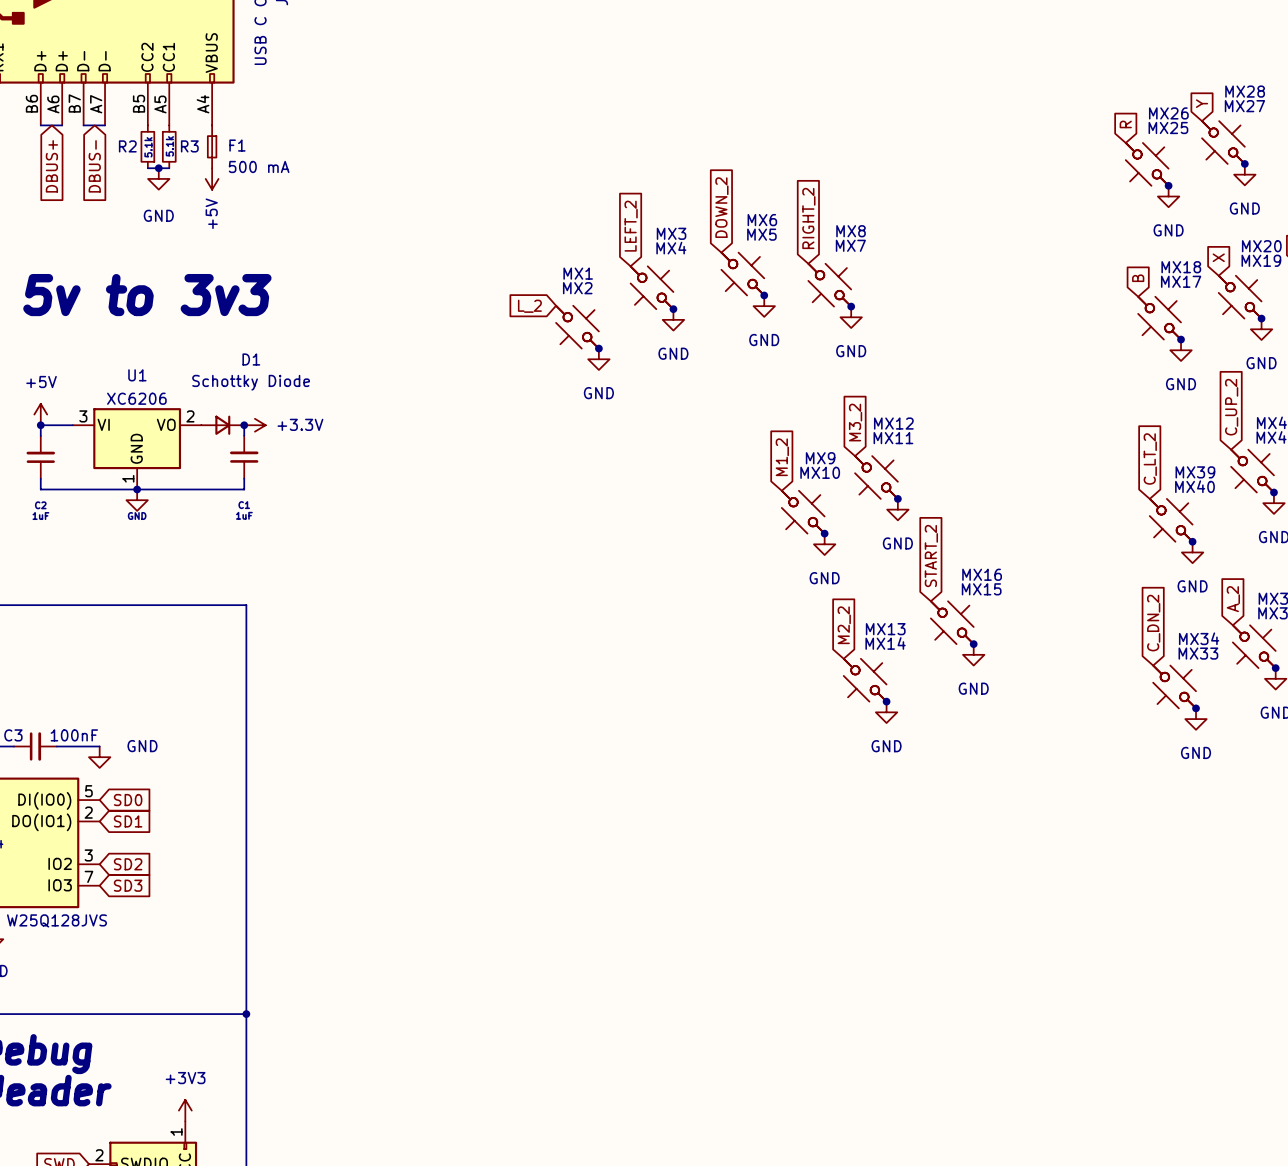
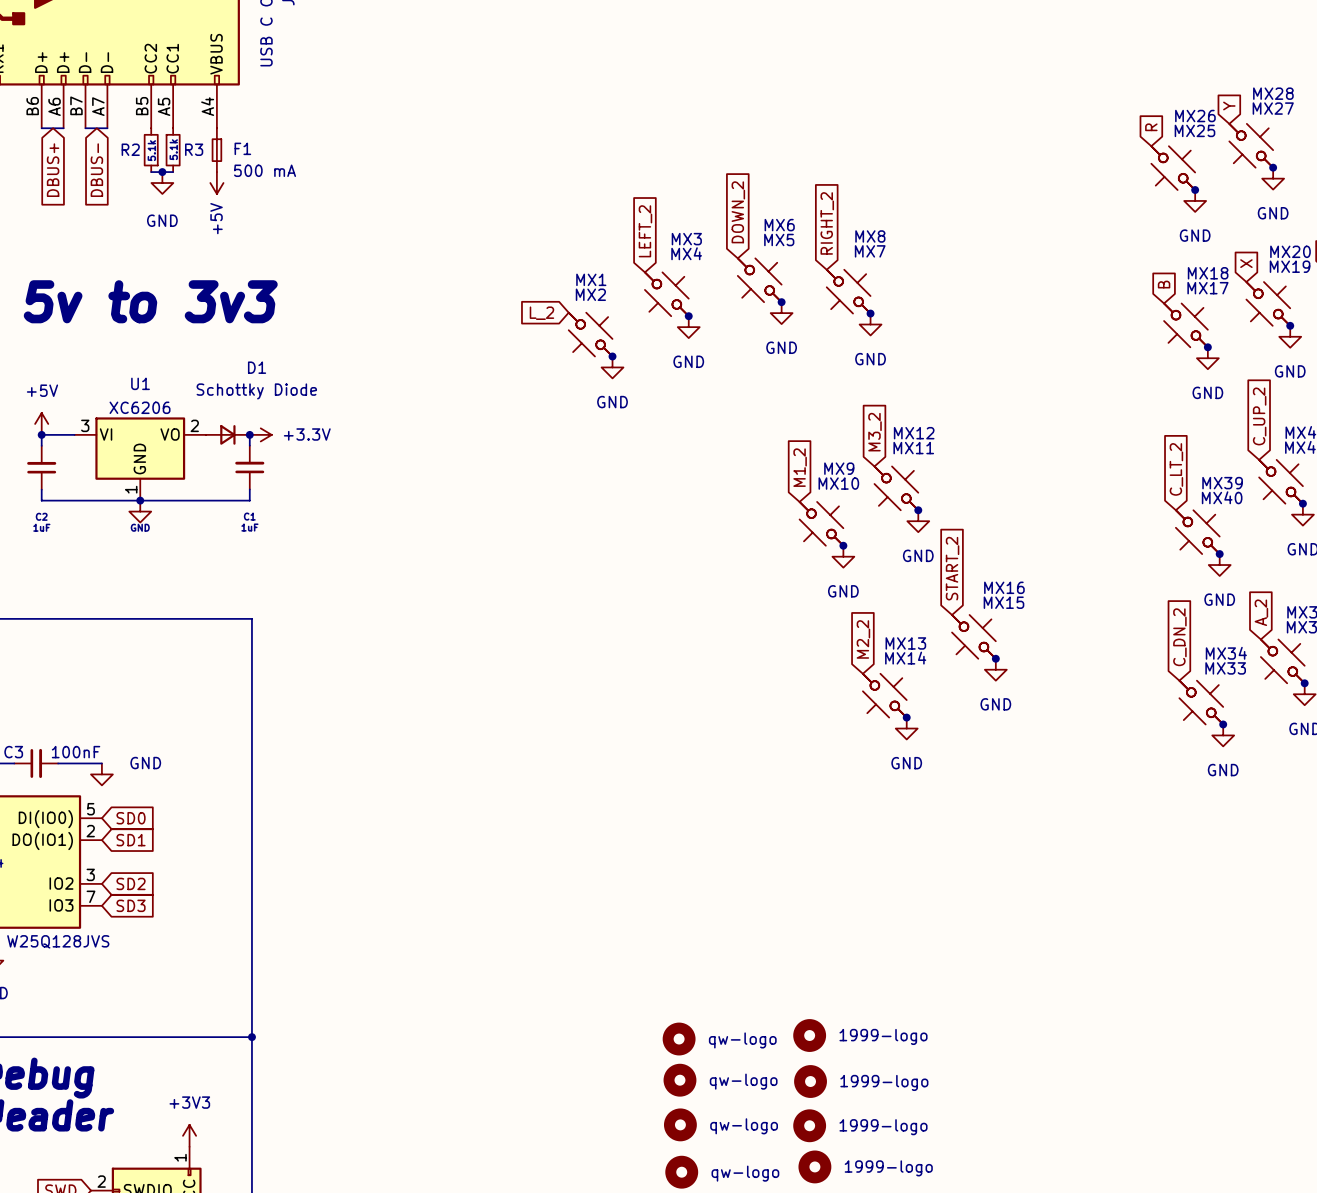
part: none -> 1999-logo (809, 1035)
part: none -> qw-logo (679, 1039)
part: none -> qw-logo (679, 1080)
part: none -> 1999-logo (810, 1081)
part: none -> qw-logo (680, 1124)
part: none -> 1999-logo (809, 1125)
part: none -> 1999-logo (814, 1166)
part: none -> qw-logo (681, 1172)

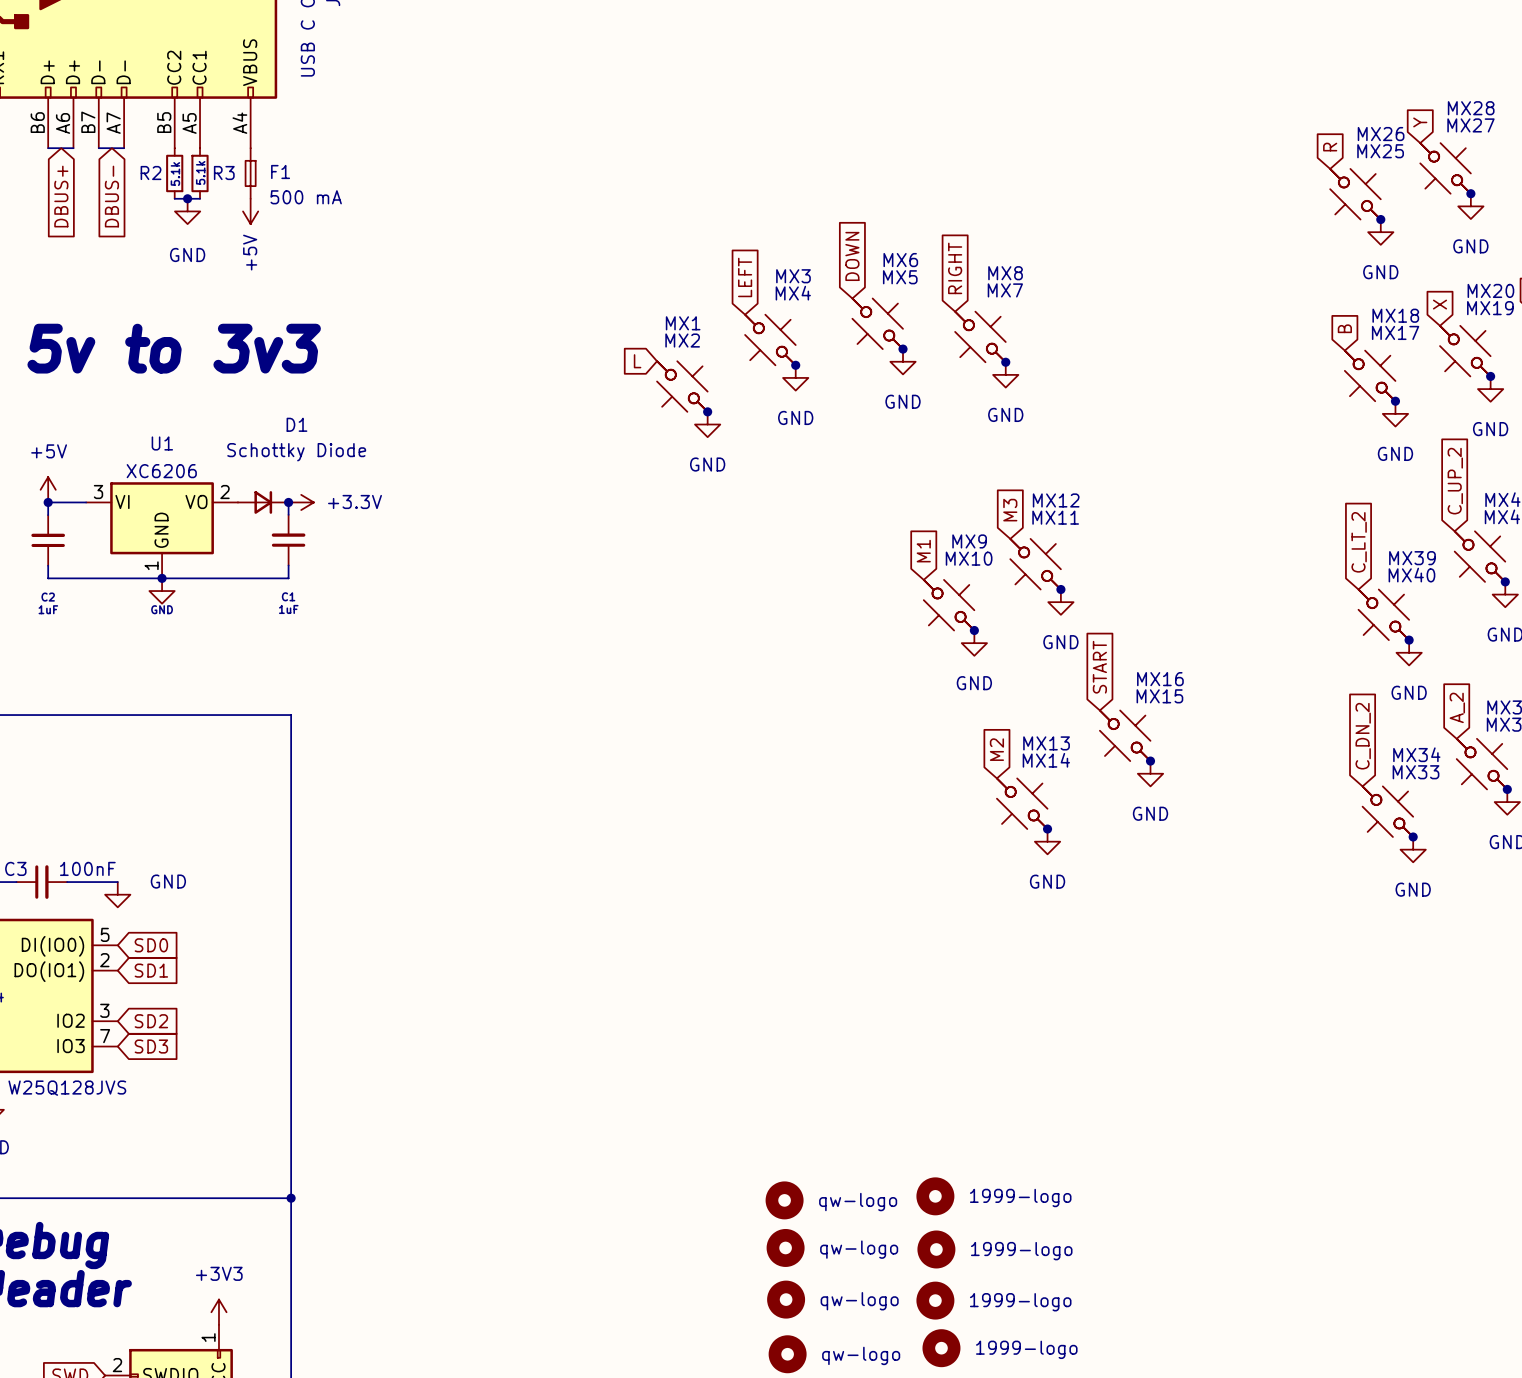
global label: DOWN_2 (738, 212) -> DOWN (852, 256)
global label: RIGHT_2 (827, 223) -> RIGHT (955, 268)
global label: LEFT_2 (645, 231) -> LEFT (745, 277)
global label: L_2 (541, 313) -> L (637, 361)
global label: M3_2 (875, 432) -> M3 (1010, 510)
global label: M1_2 (800, 467) -> M1 (923, 551)
global label: START_2 (952, 568) -> START (1099, 667)
global label: M2_2 (863, 639) -> M2 (996, 749)

